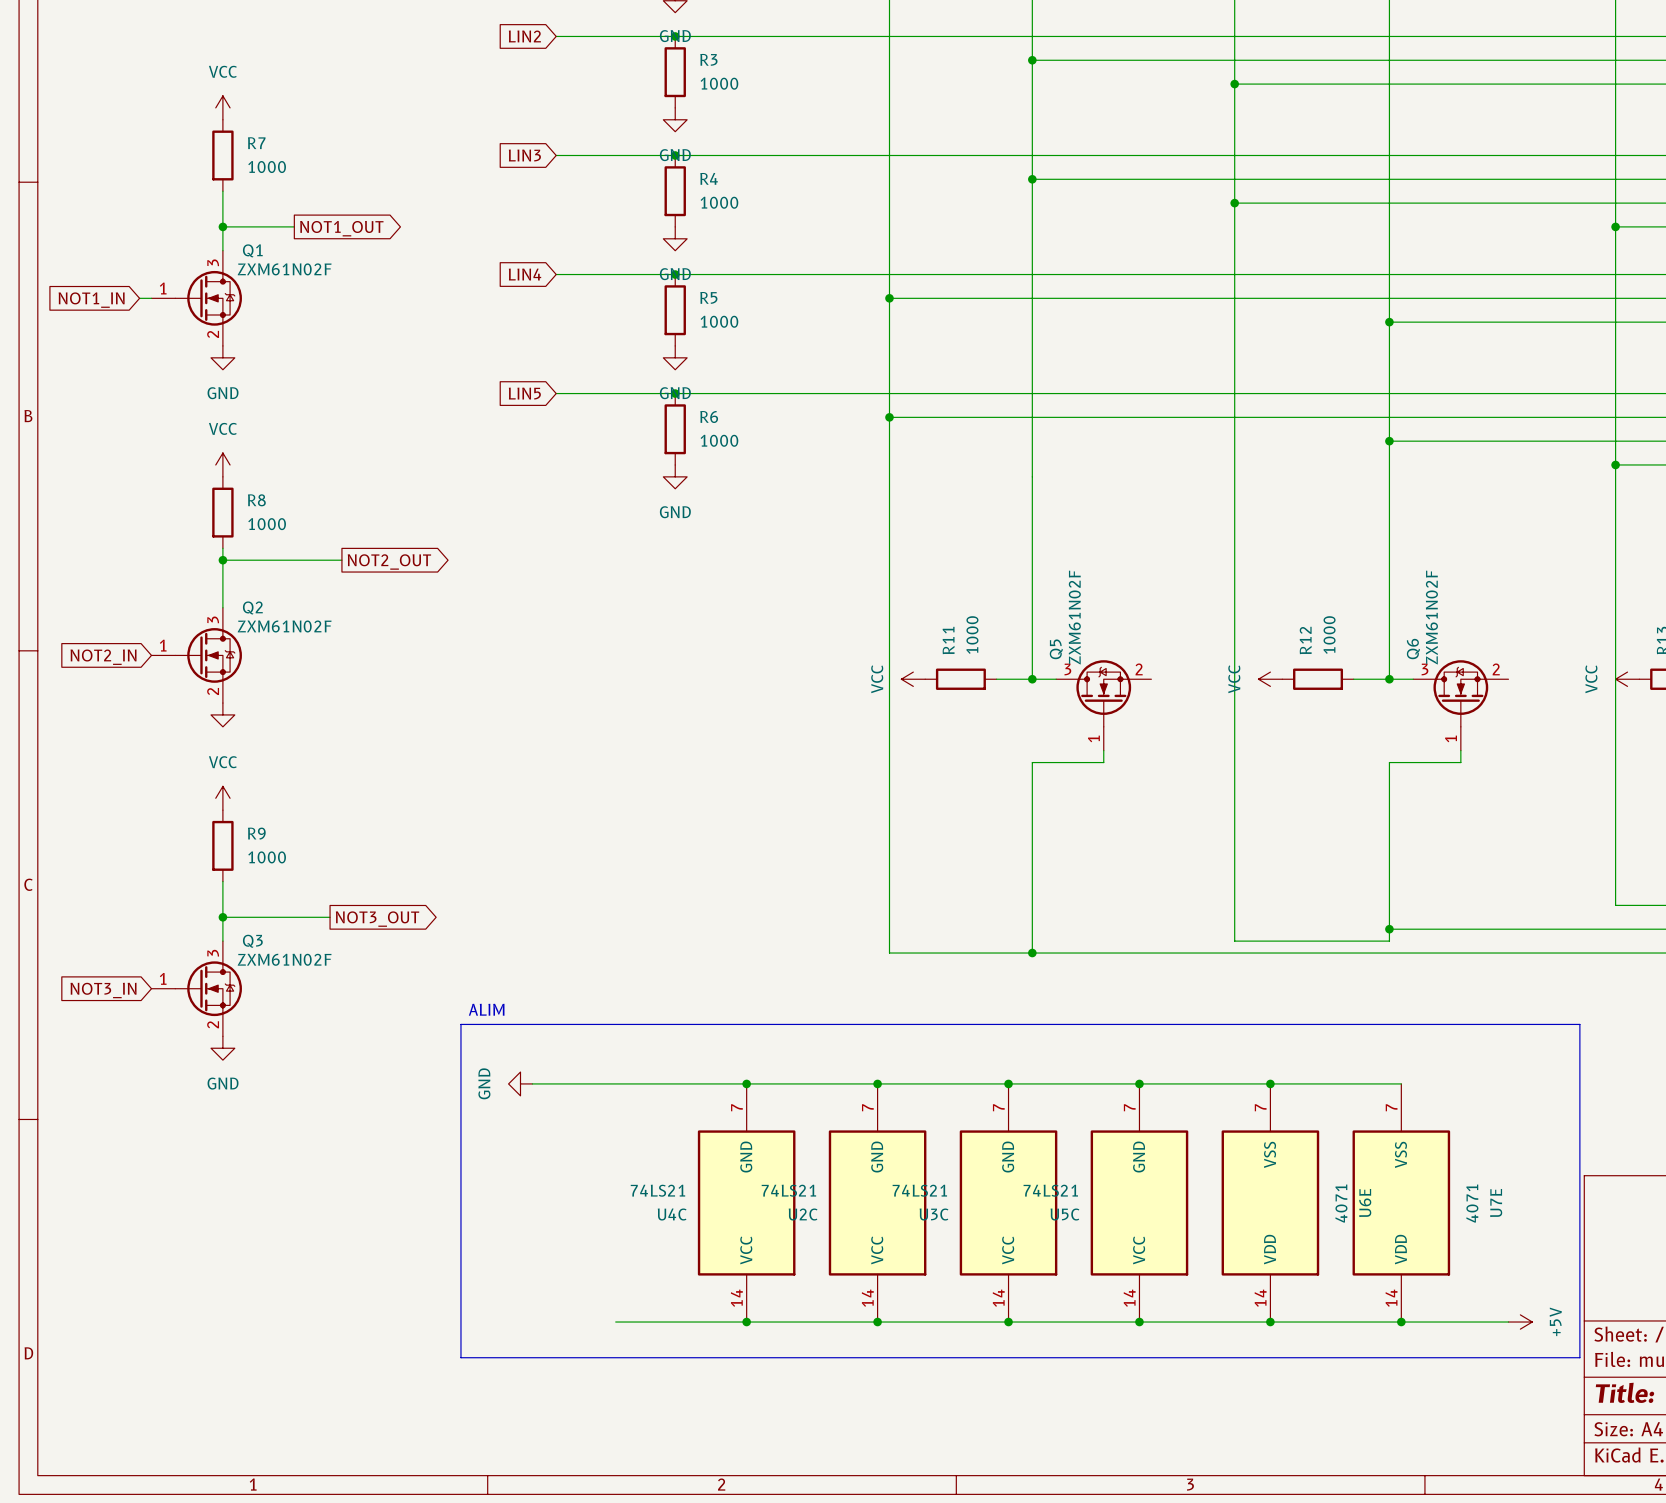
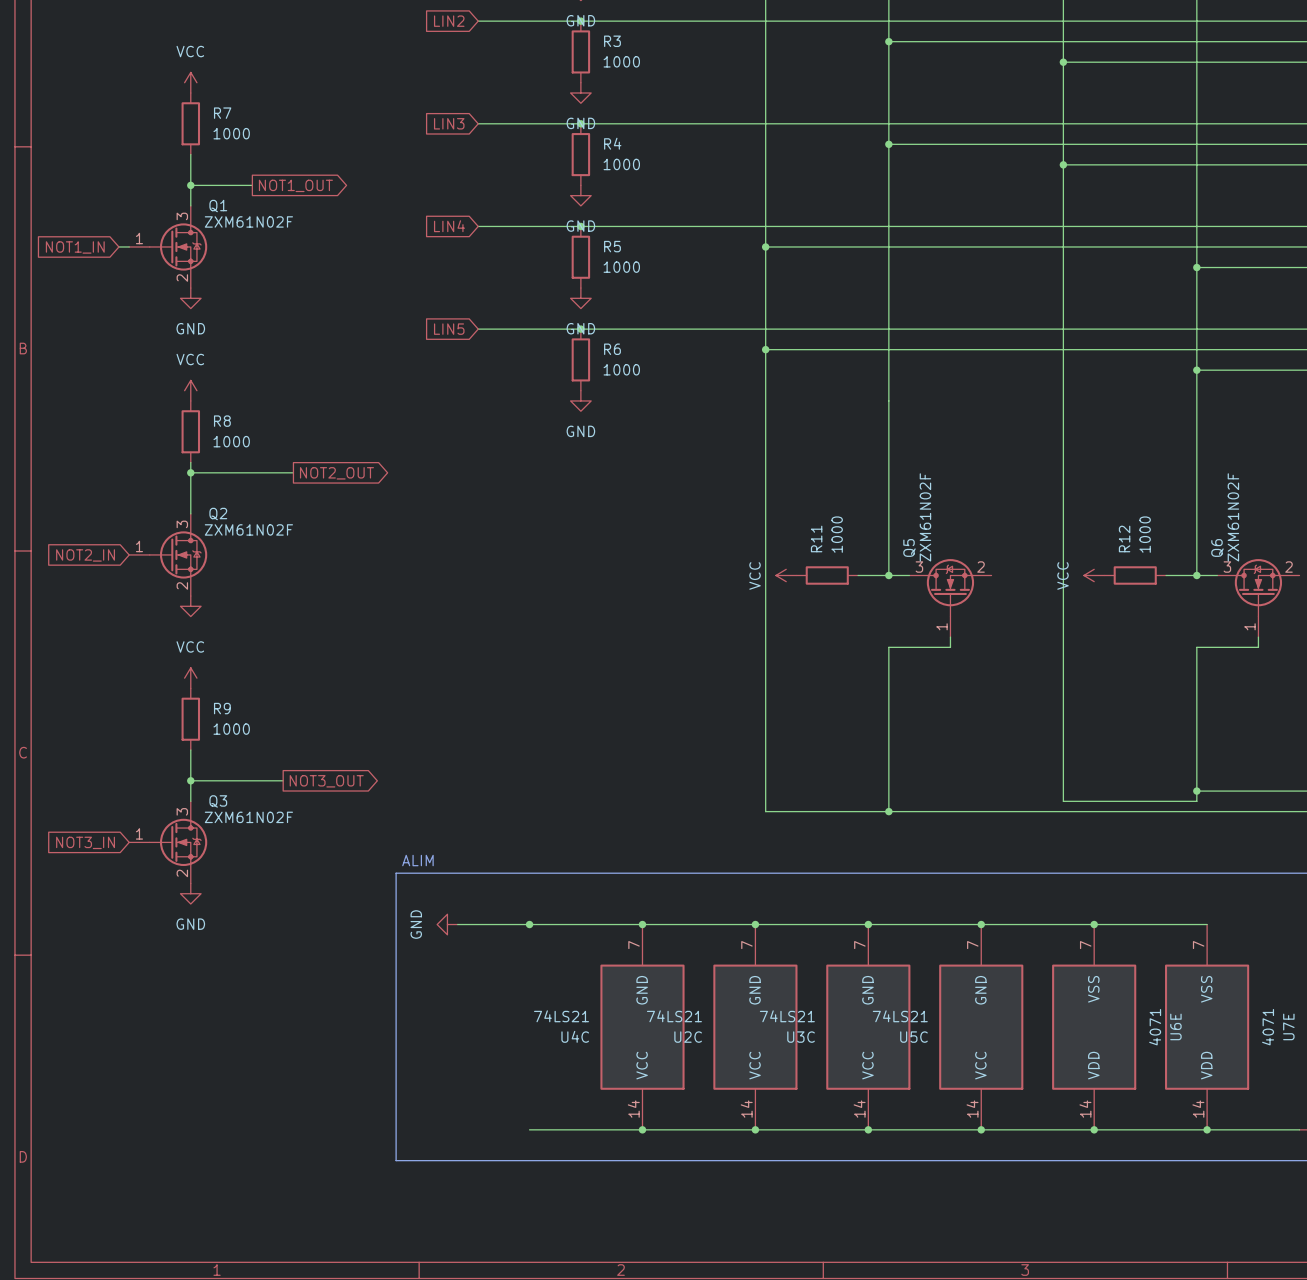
junction: none -> (529, 924)

